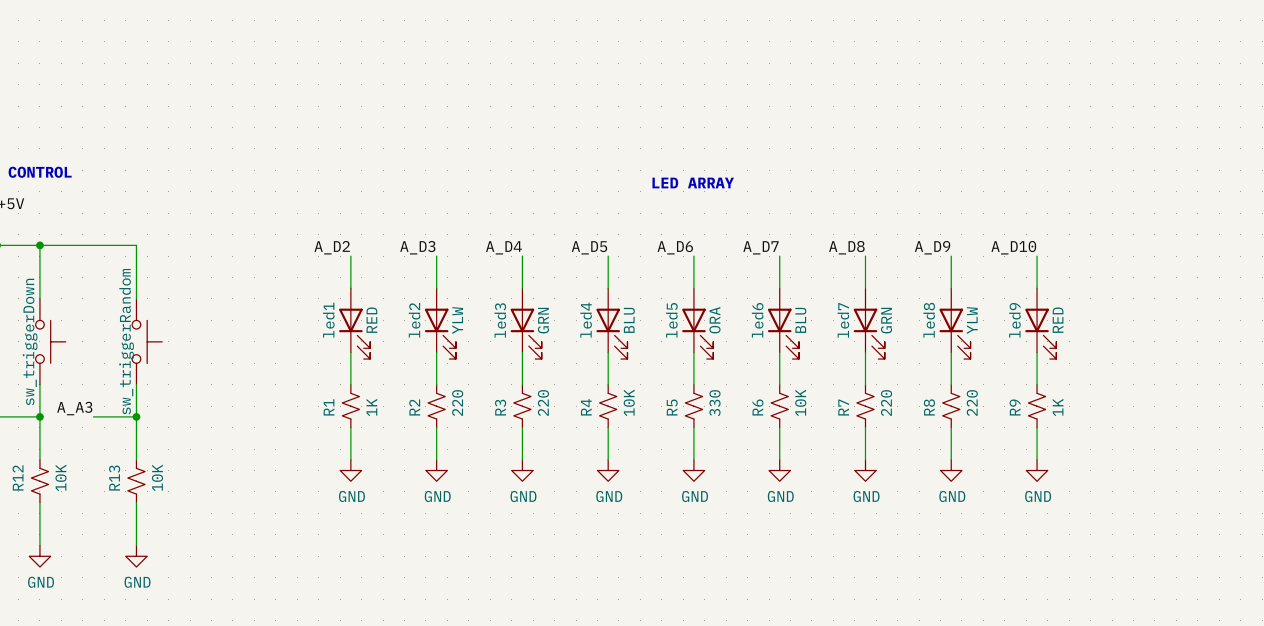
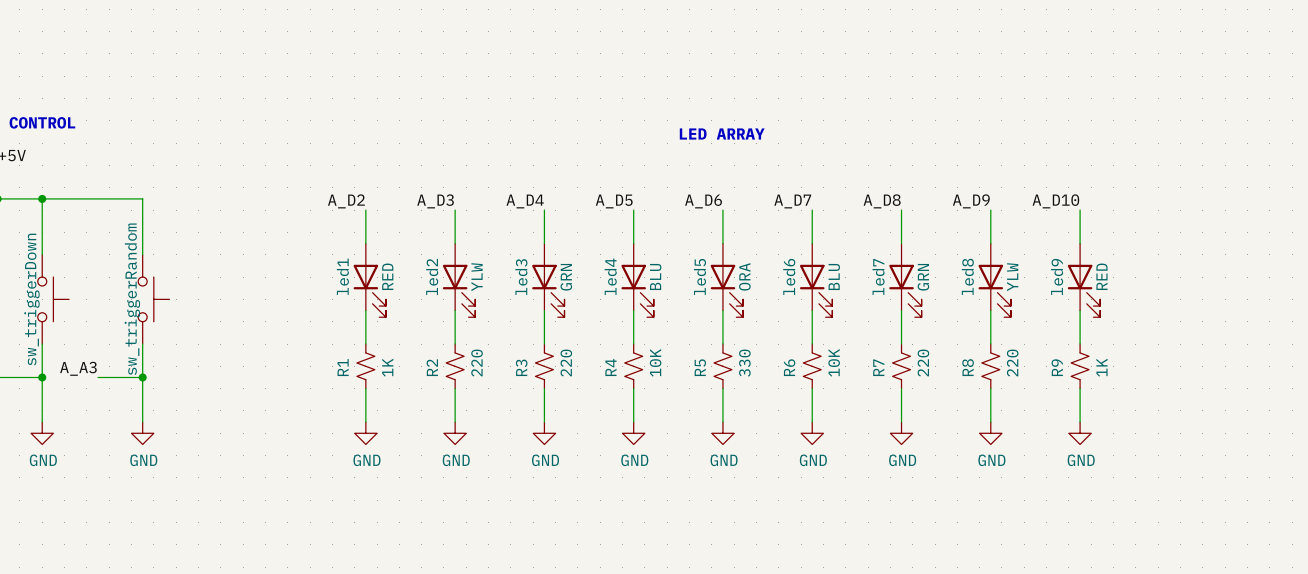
power symbol: none -> GND (42, 433)
power symbol: none -> GND (142, 433)
R12: 10K (39, 481) -> none
R13: 10K (136, 481) -> none
wire: (39, 502) (39, 545) -> none
wire: (136, 502) (136, 545) -> none
power symbol: GND (39, 556) -> none
power symbol: GND (136, 556) -> none

